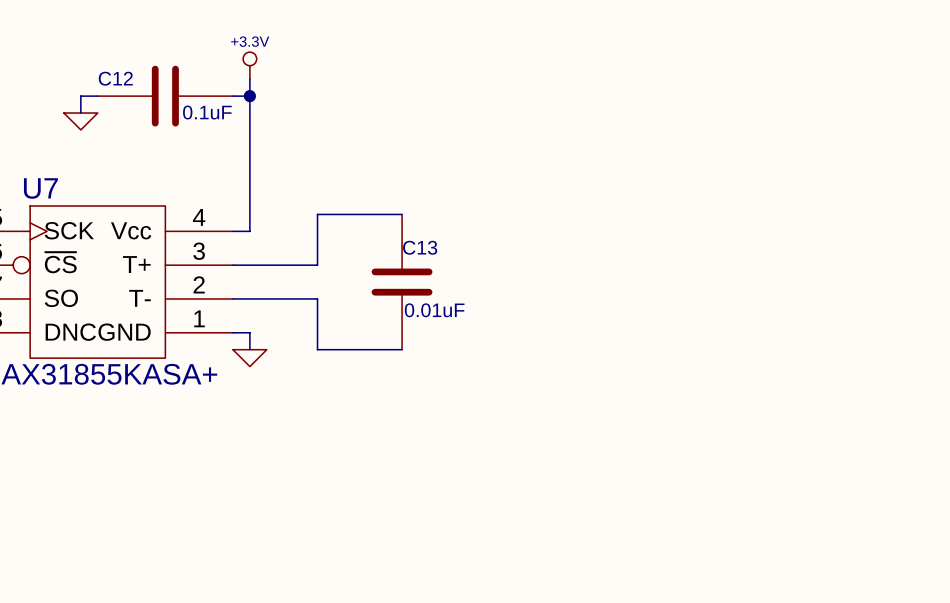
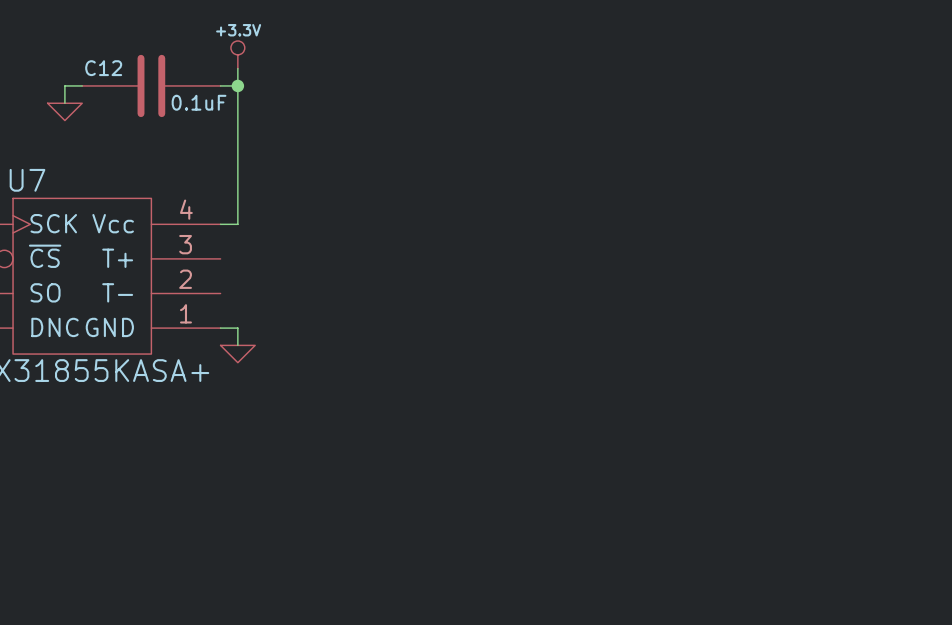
wire: (402, 214) (317, 214) (317, 265) (232, 265) -> none
C13: 0.01uF (402, 282) -> none
wire: (232, 298) (317, 298) (317, 349) (402, 349) -> none

